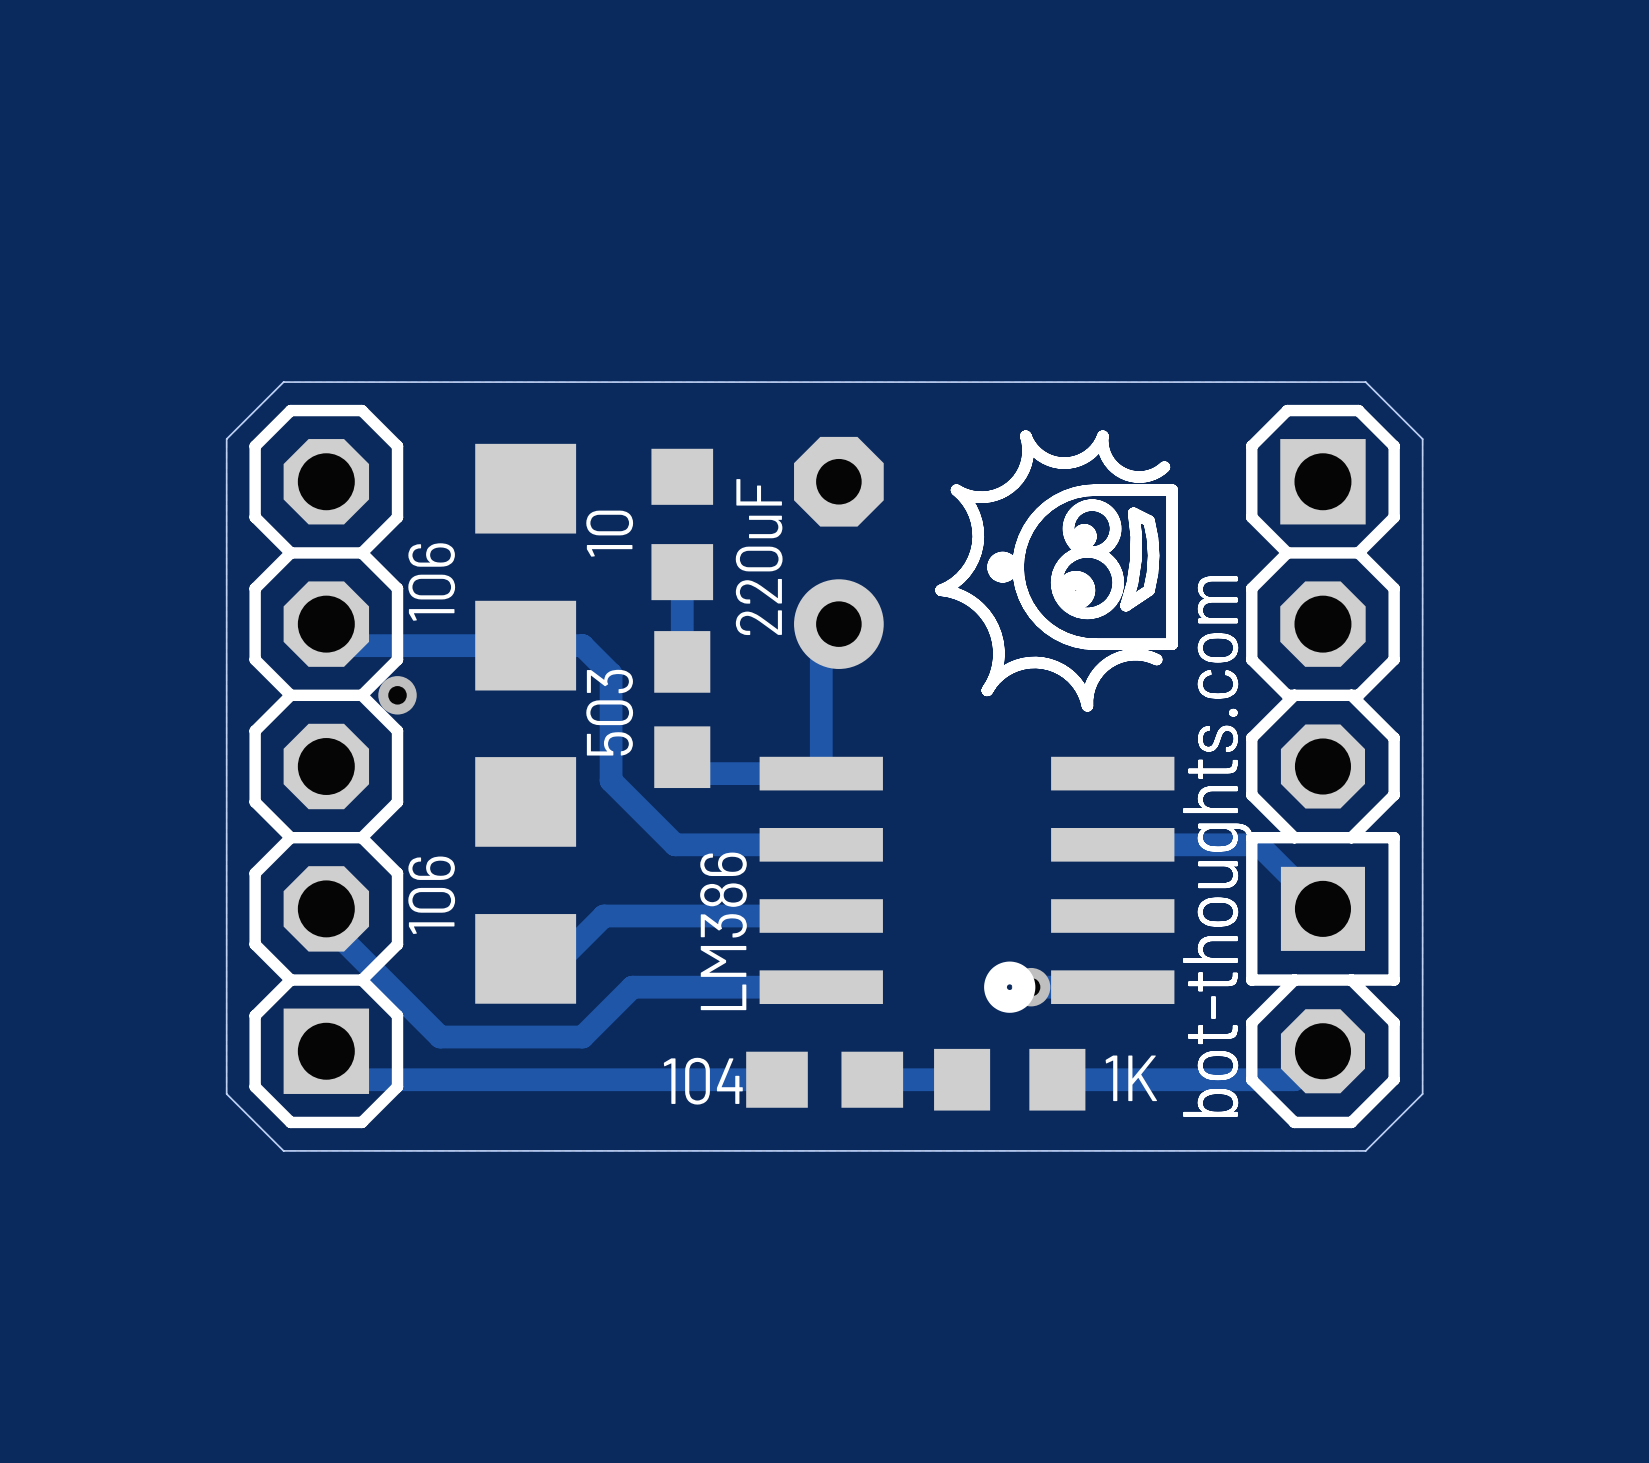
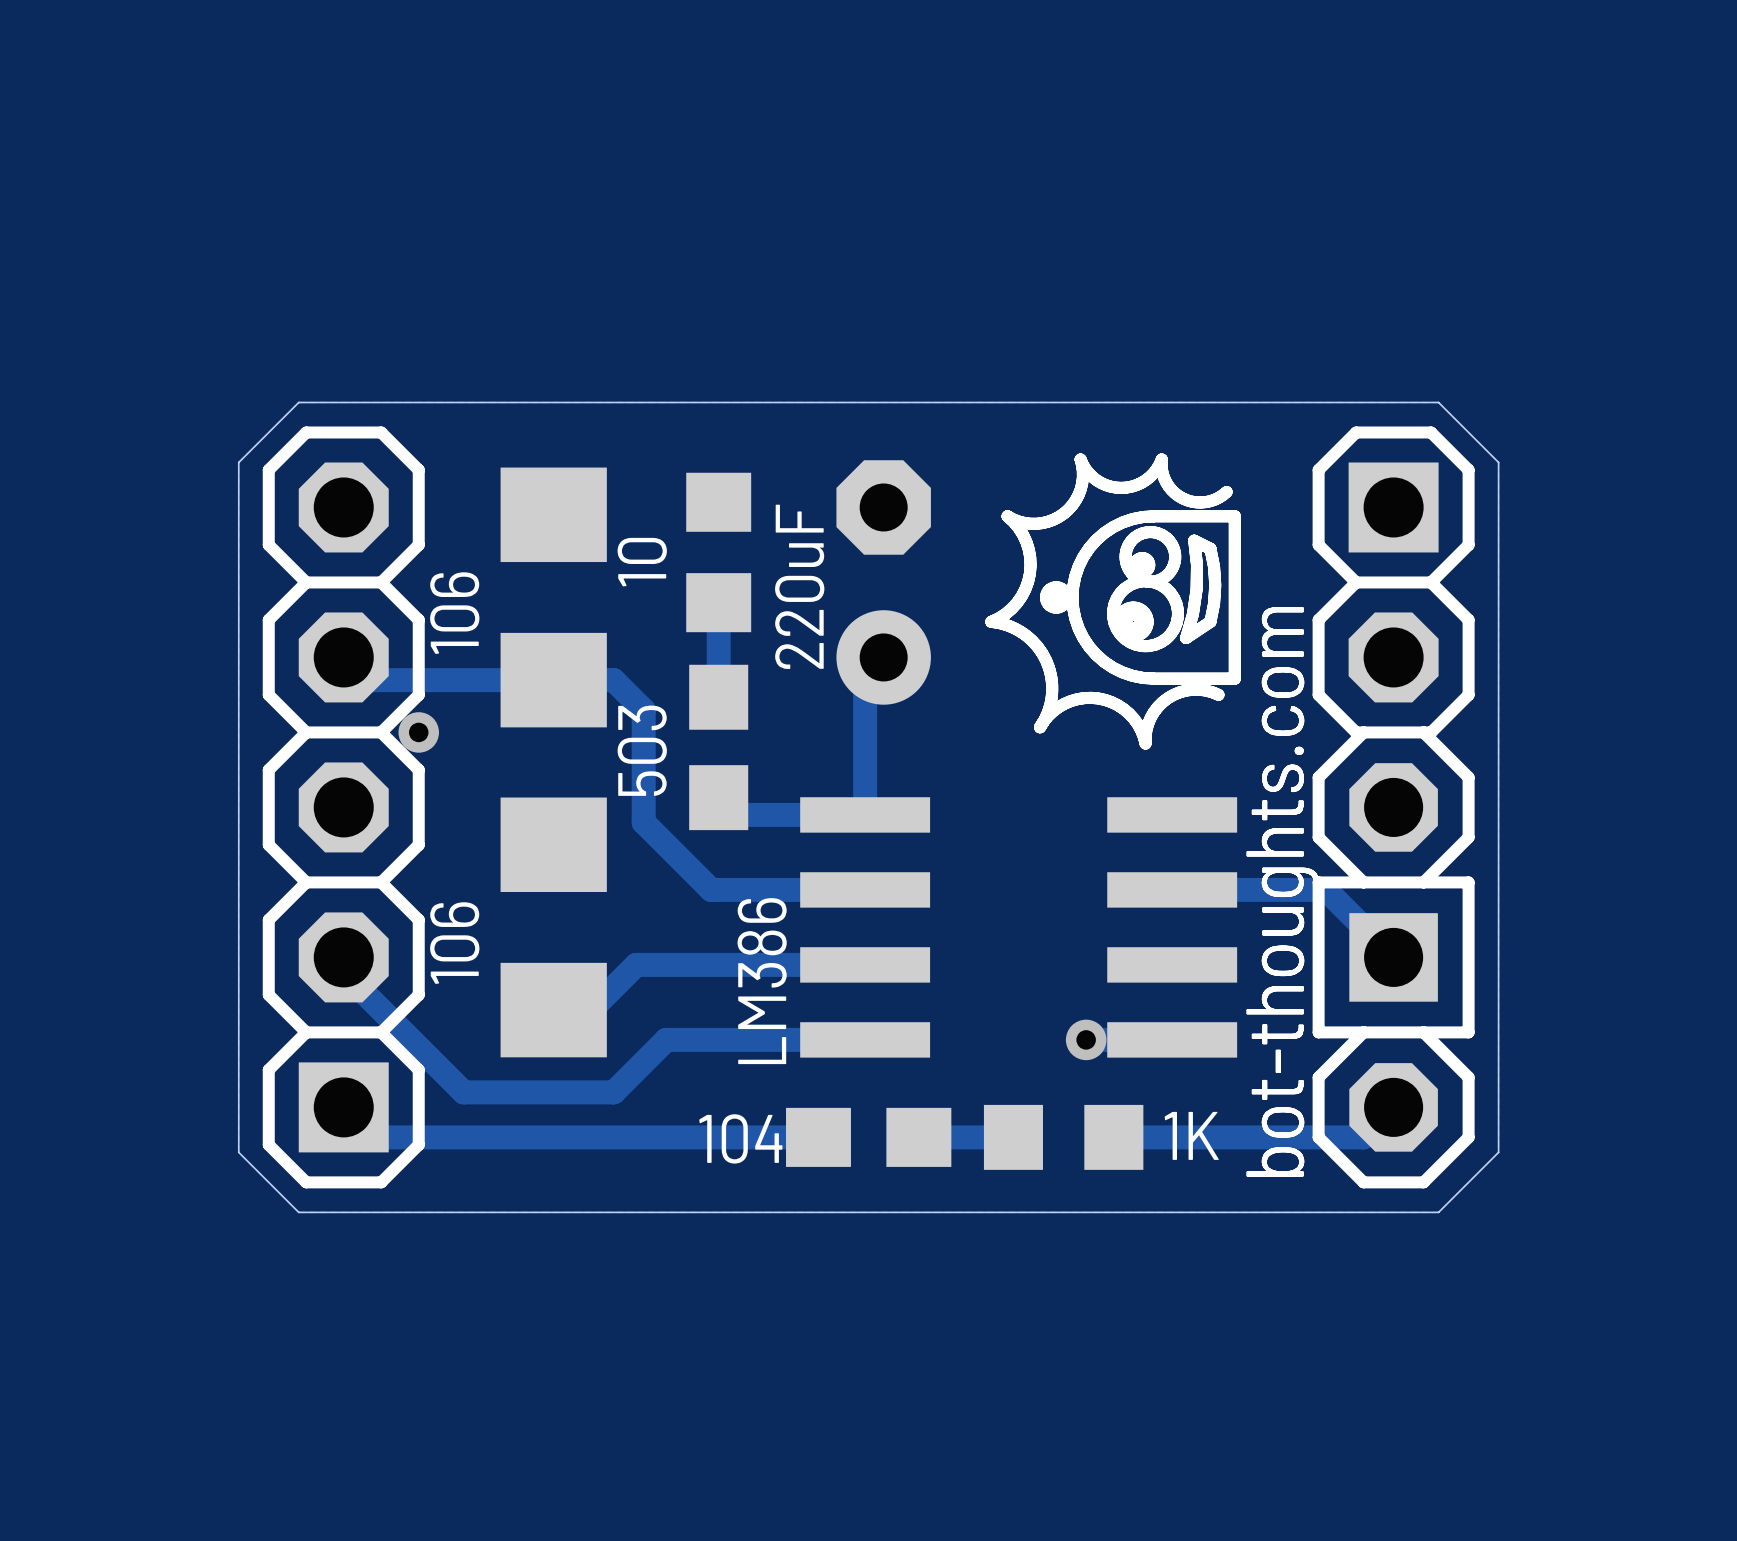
drawing: [984, 961, 1036, 1013] -> none

